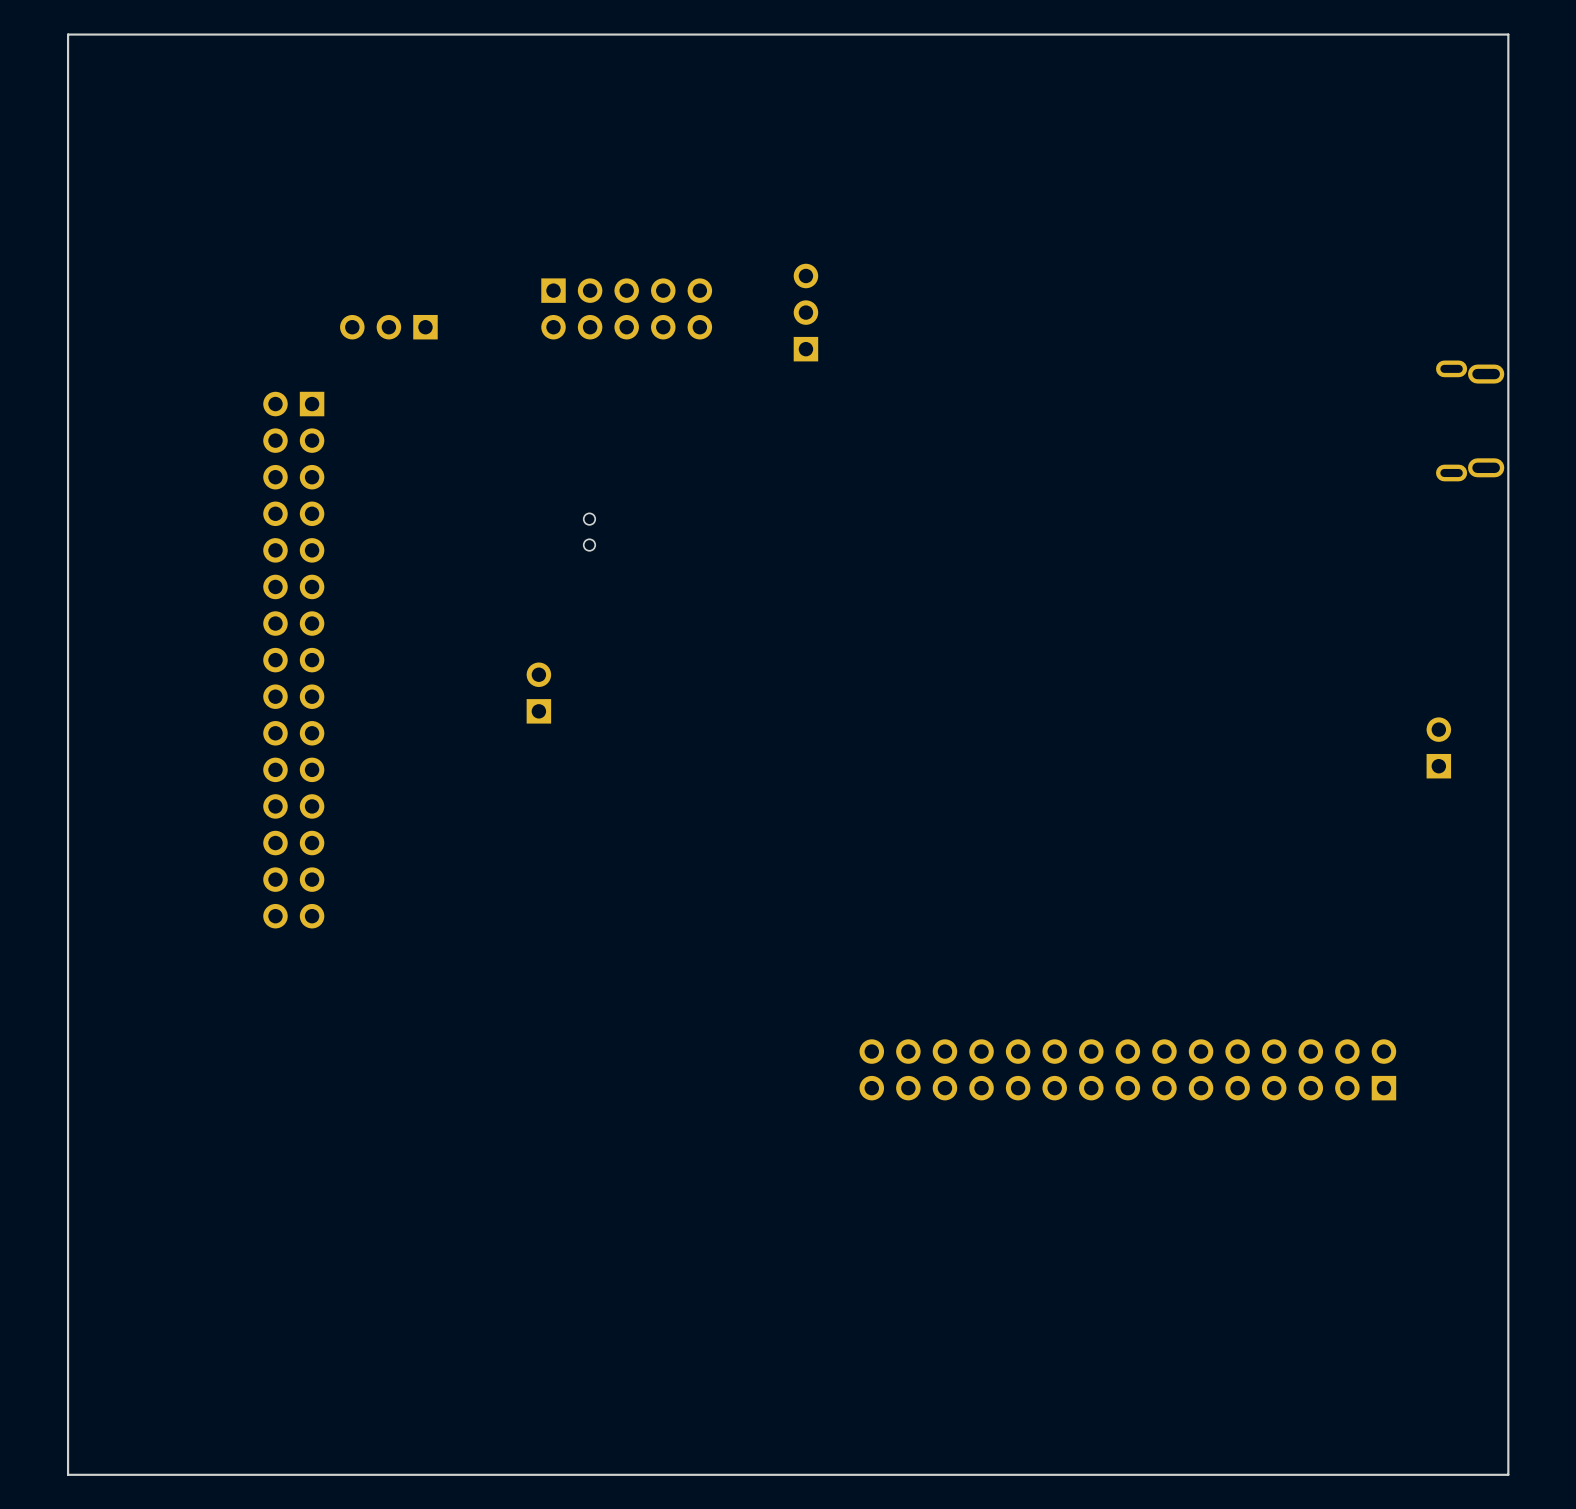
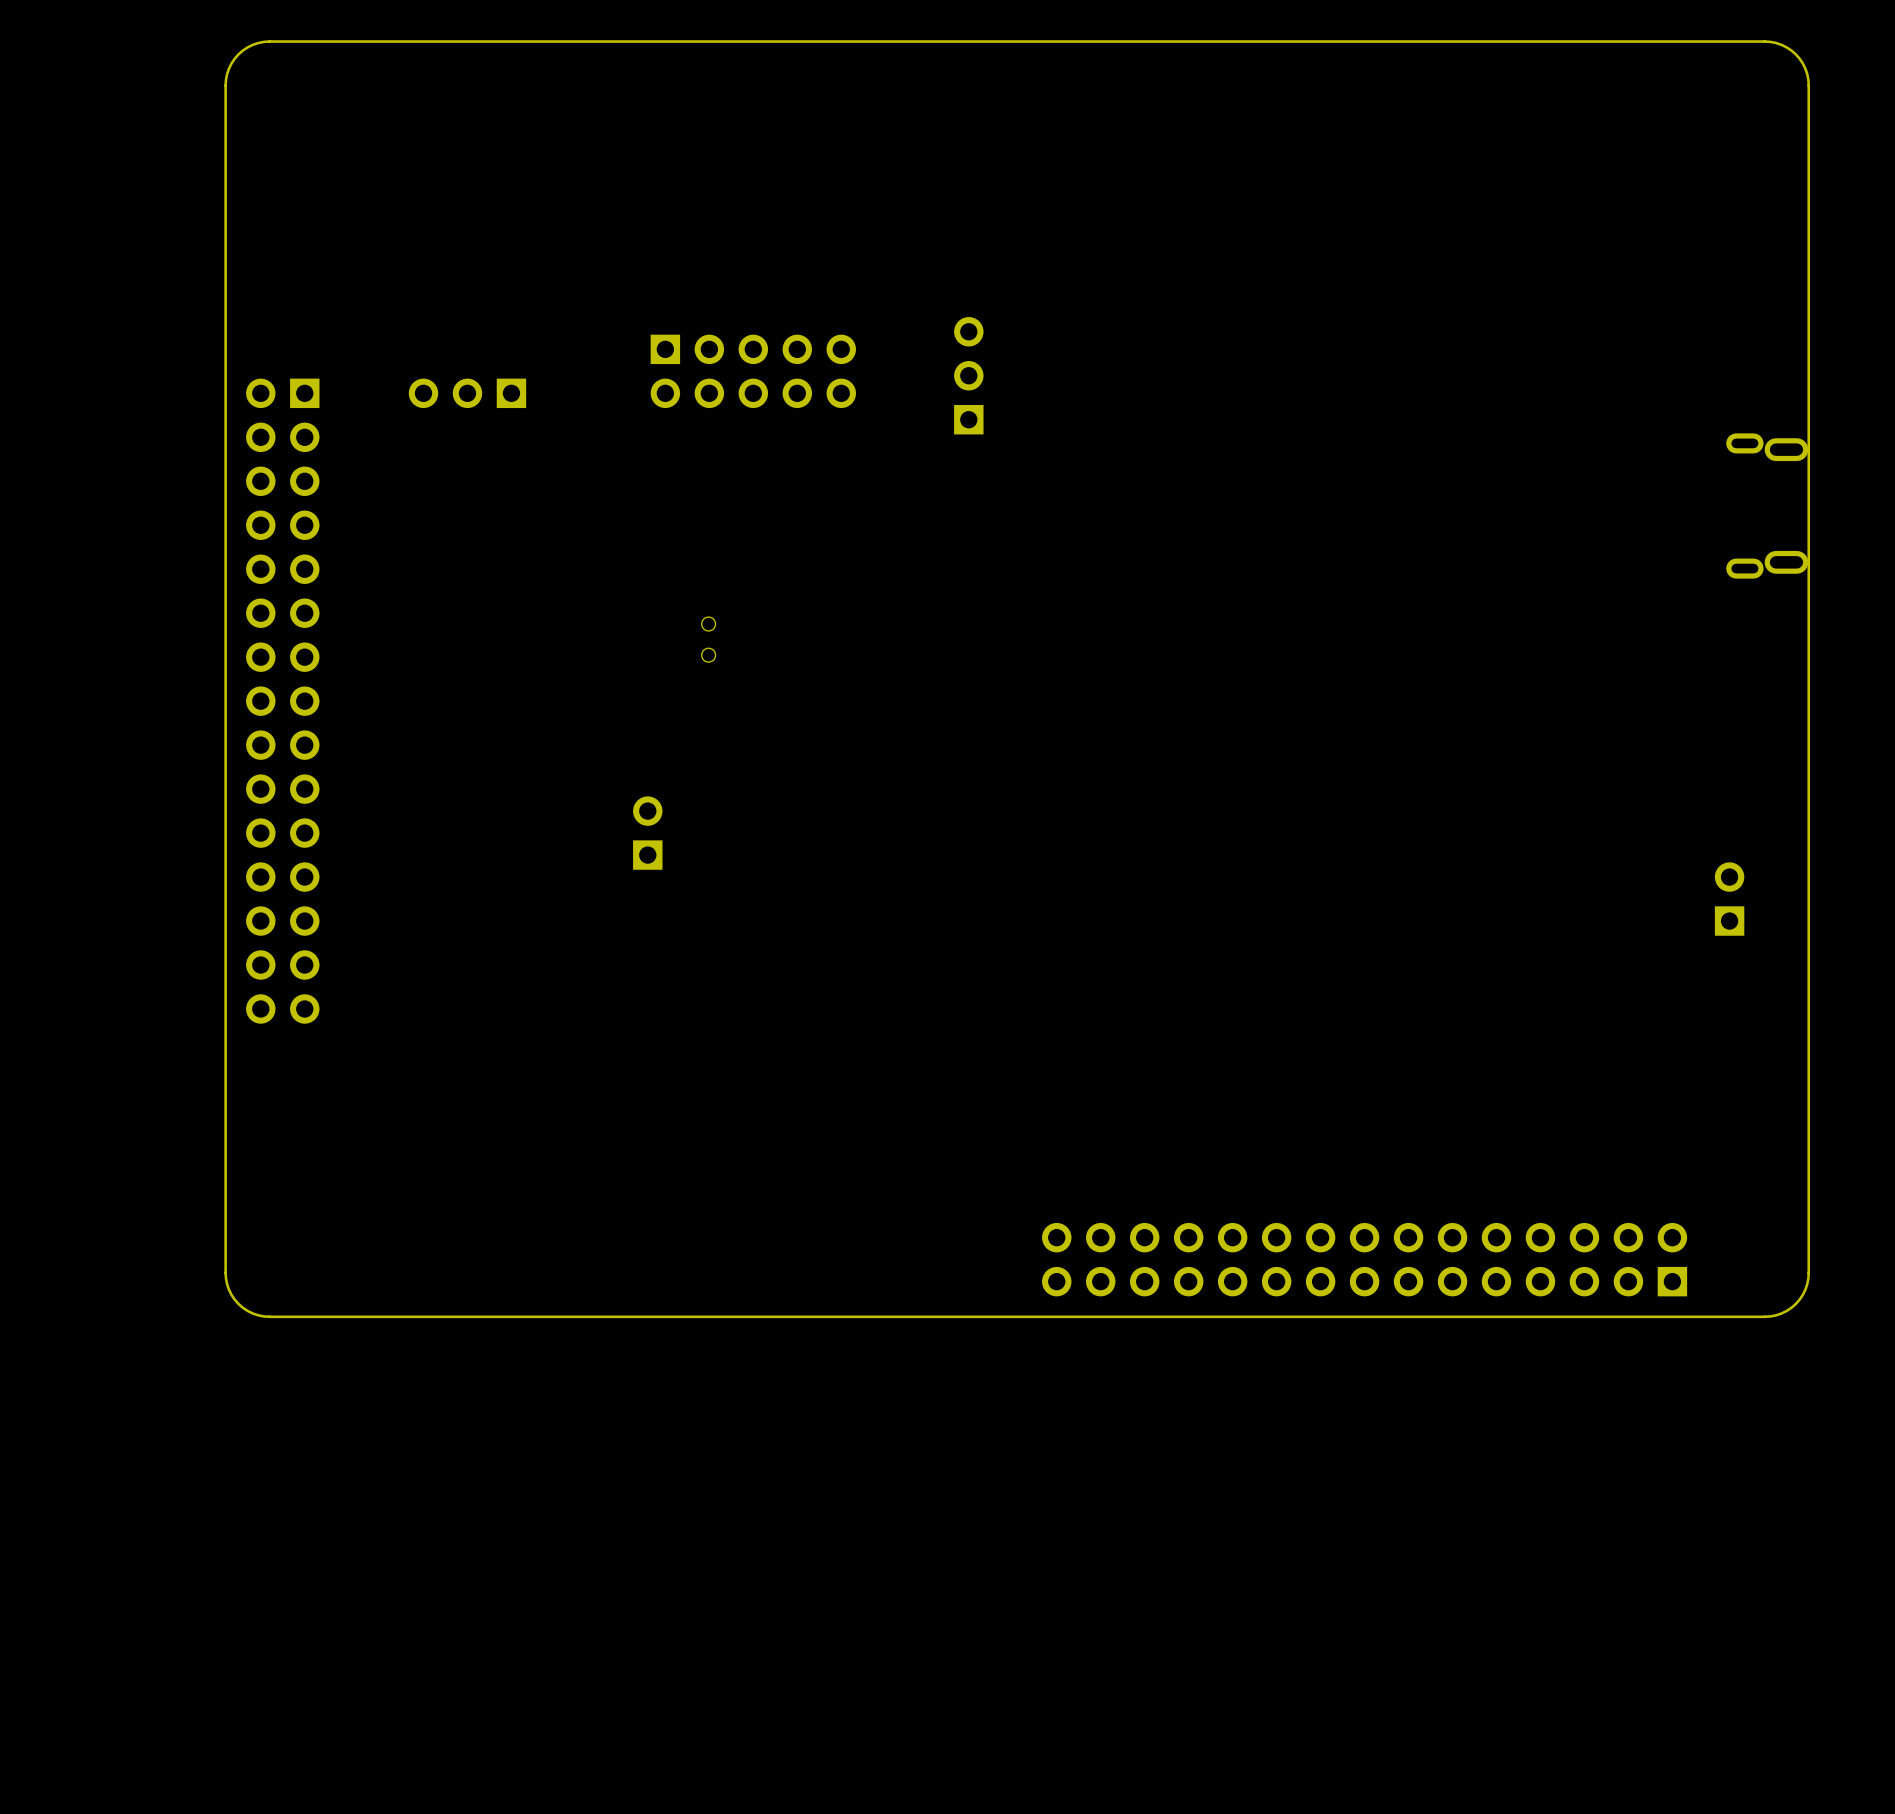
board edge: (1468, 34) (1508, 34) (1508, 1474) (68, 1474) (68, 34) (224, 34) -> (1764, 41) (1781, 44) (1795, 54) (1805, 68) (1808, 85) (1808, 1272) (1805, 1289) (1795, 1303) (1781, 1313) (1764, 1316) (269, 1316) (252, 1313) (242, 1307) (231, 1294) (225, 1272) (225, 85) (228, 68) (238, 54) (252, 44) (269, 41)
part position: (293, 660) -> (282, 701)
part position: (1127, 1069) -> (1364, 1259)

